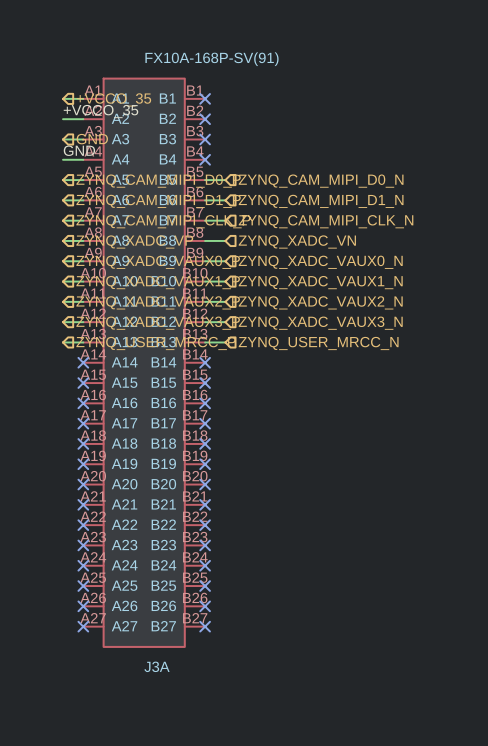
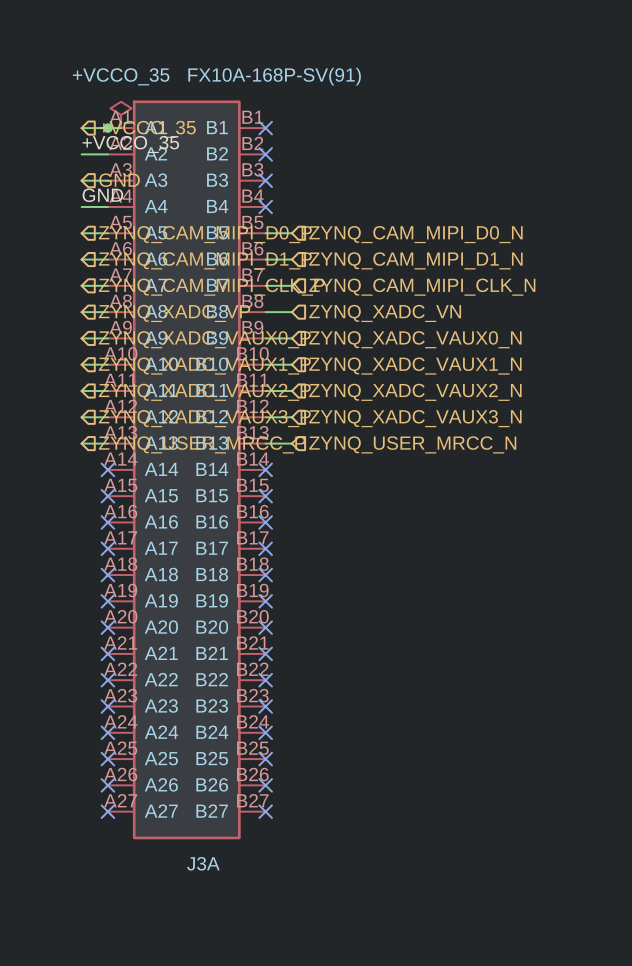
power symbol: none -> +VCCO_35 (121, 114)
junction: none -> (107, 128)

